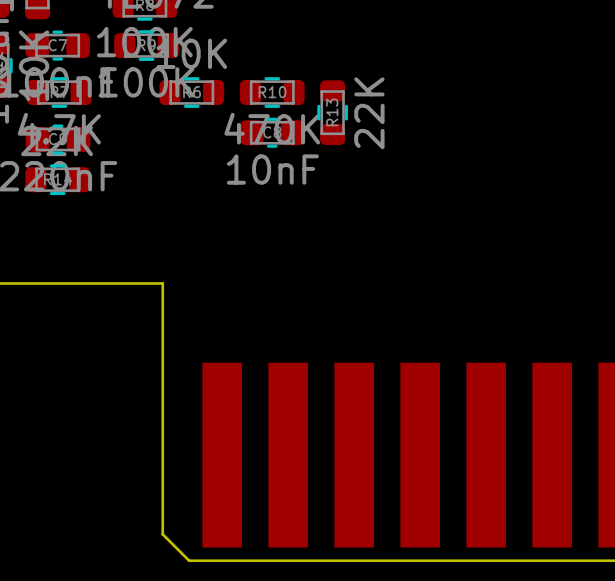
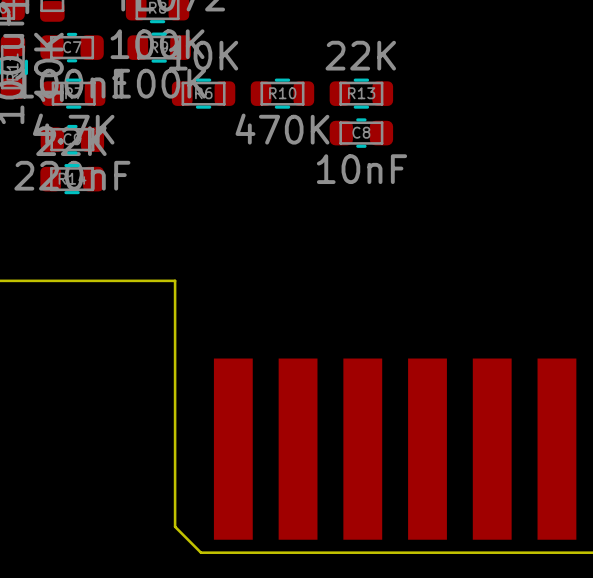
R13 rotation: 0° (332, 112) -> 90° clockwise (361, 93)
R13 value position: 22K (369, 113) -> 22K (360, 55)
C8 position: (272, 132) -> (361, 133)

